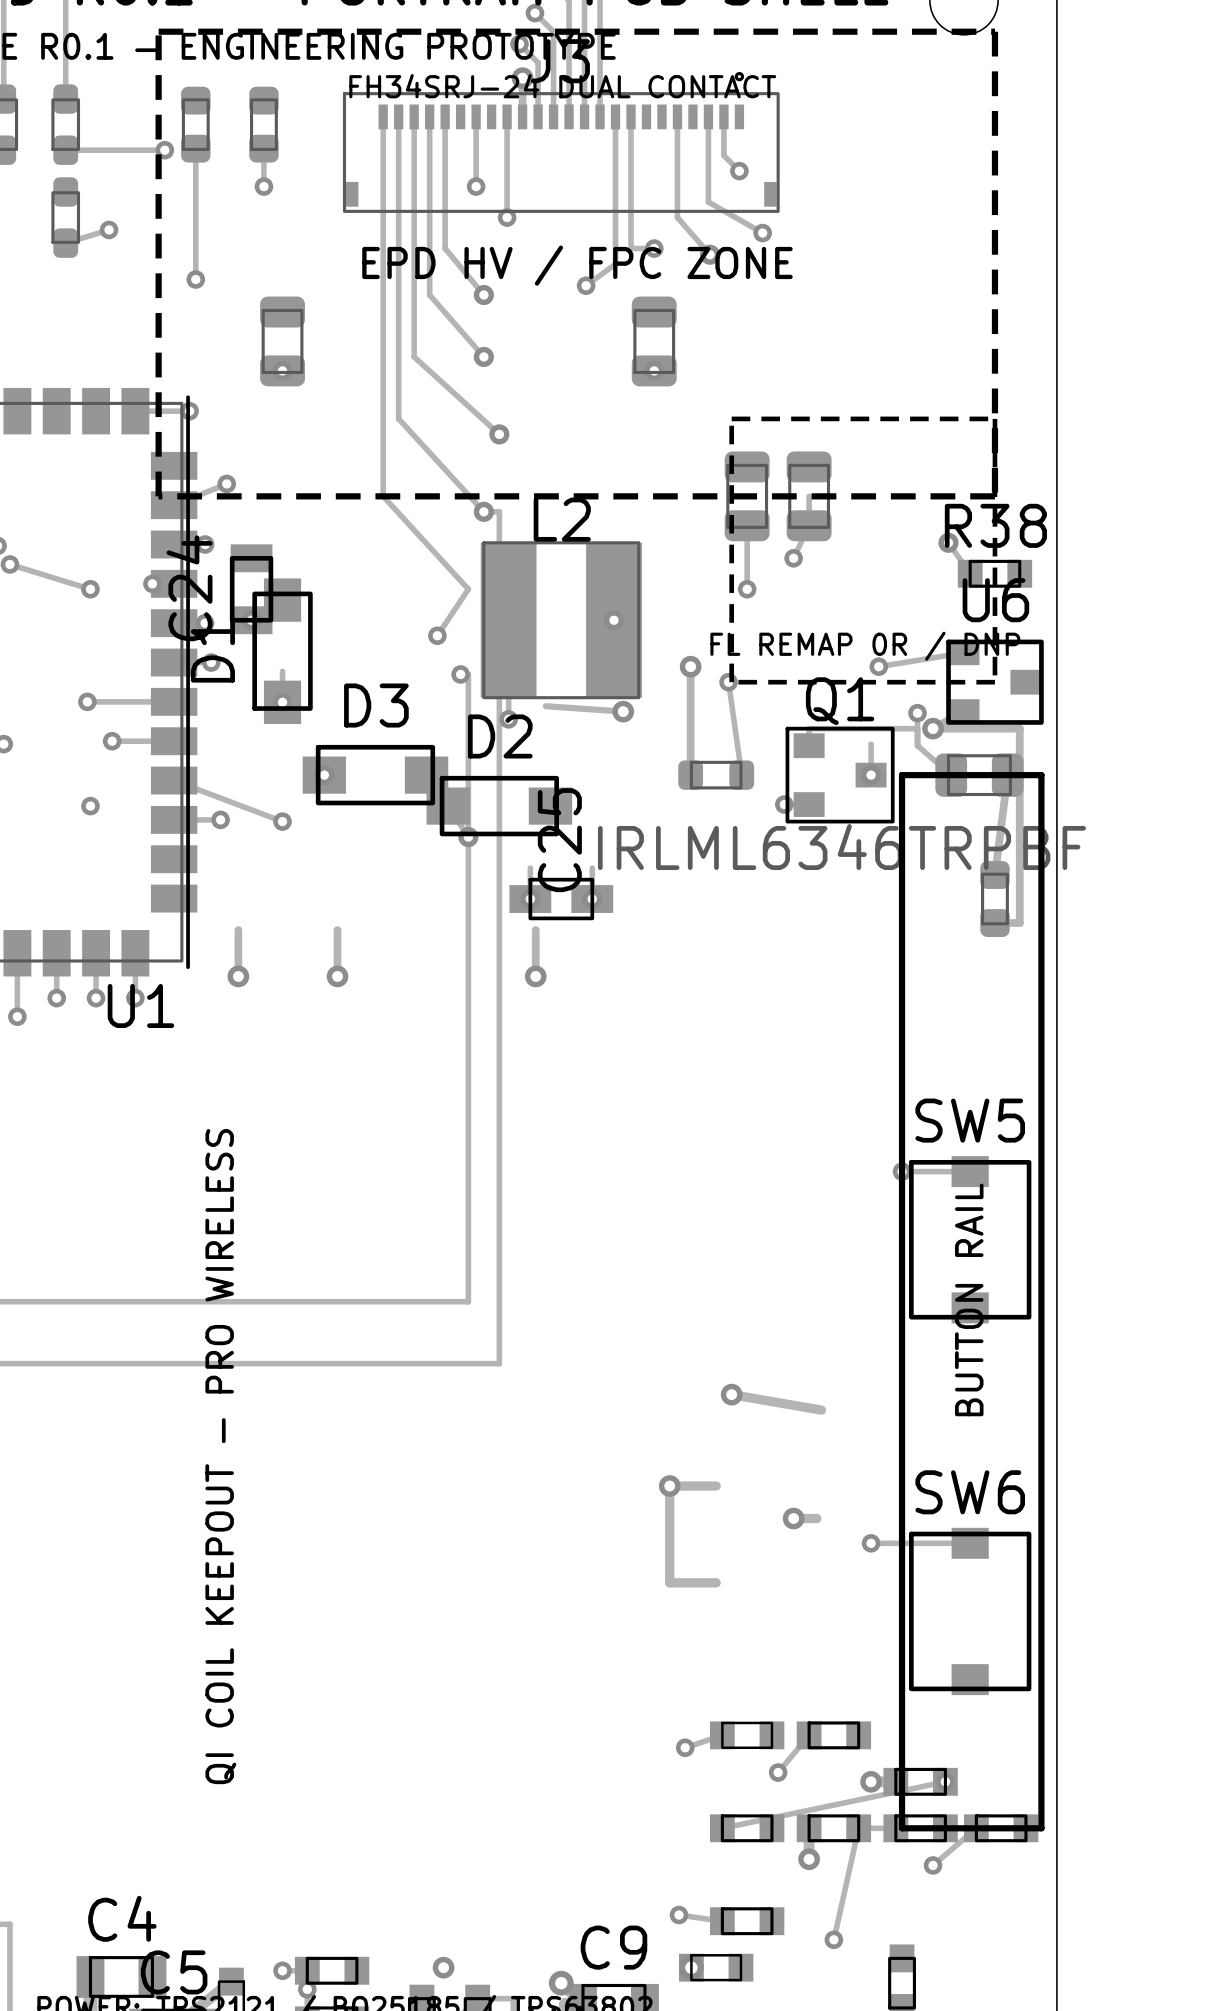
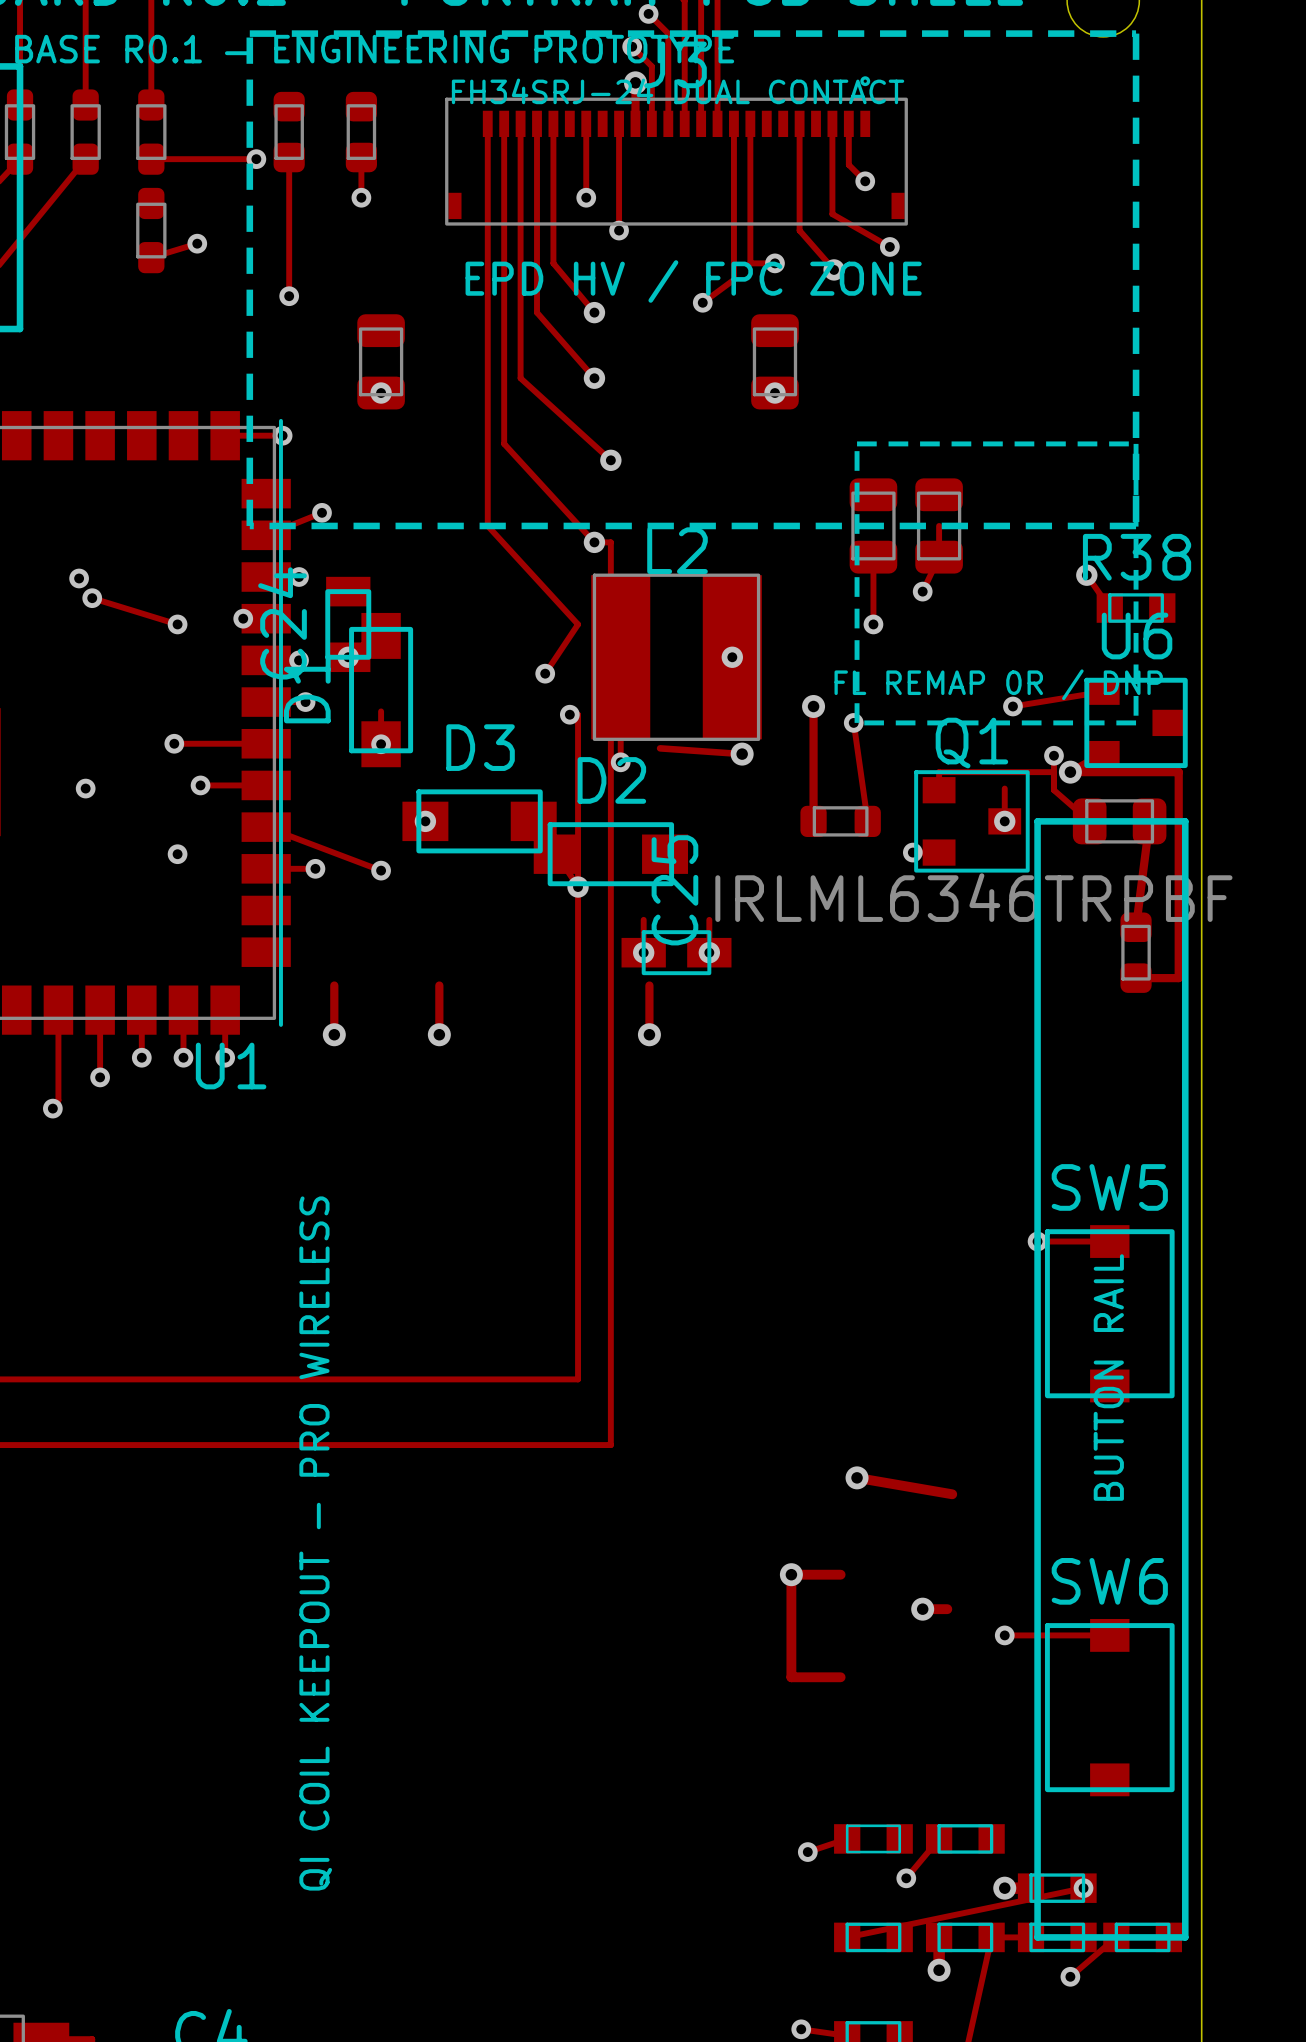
track: (1019, 728) (1019, 923) -> (1162, 772) (1178, 772) (1178, 978) (1162, 978)

